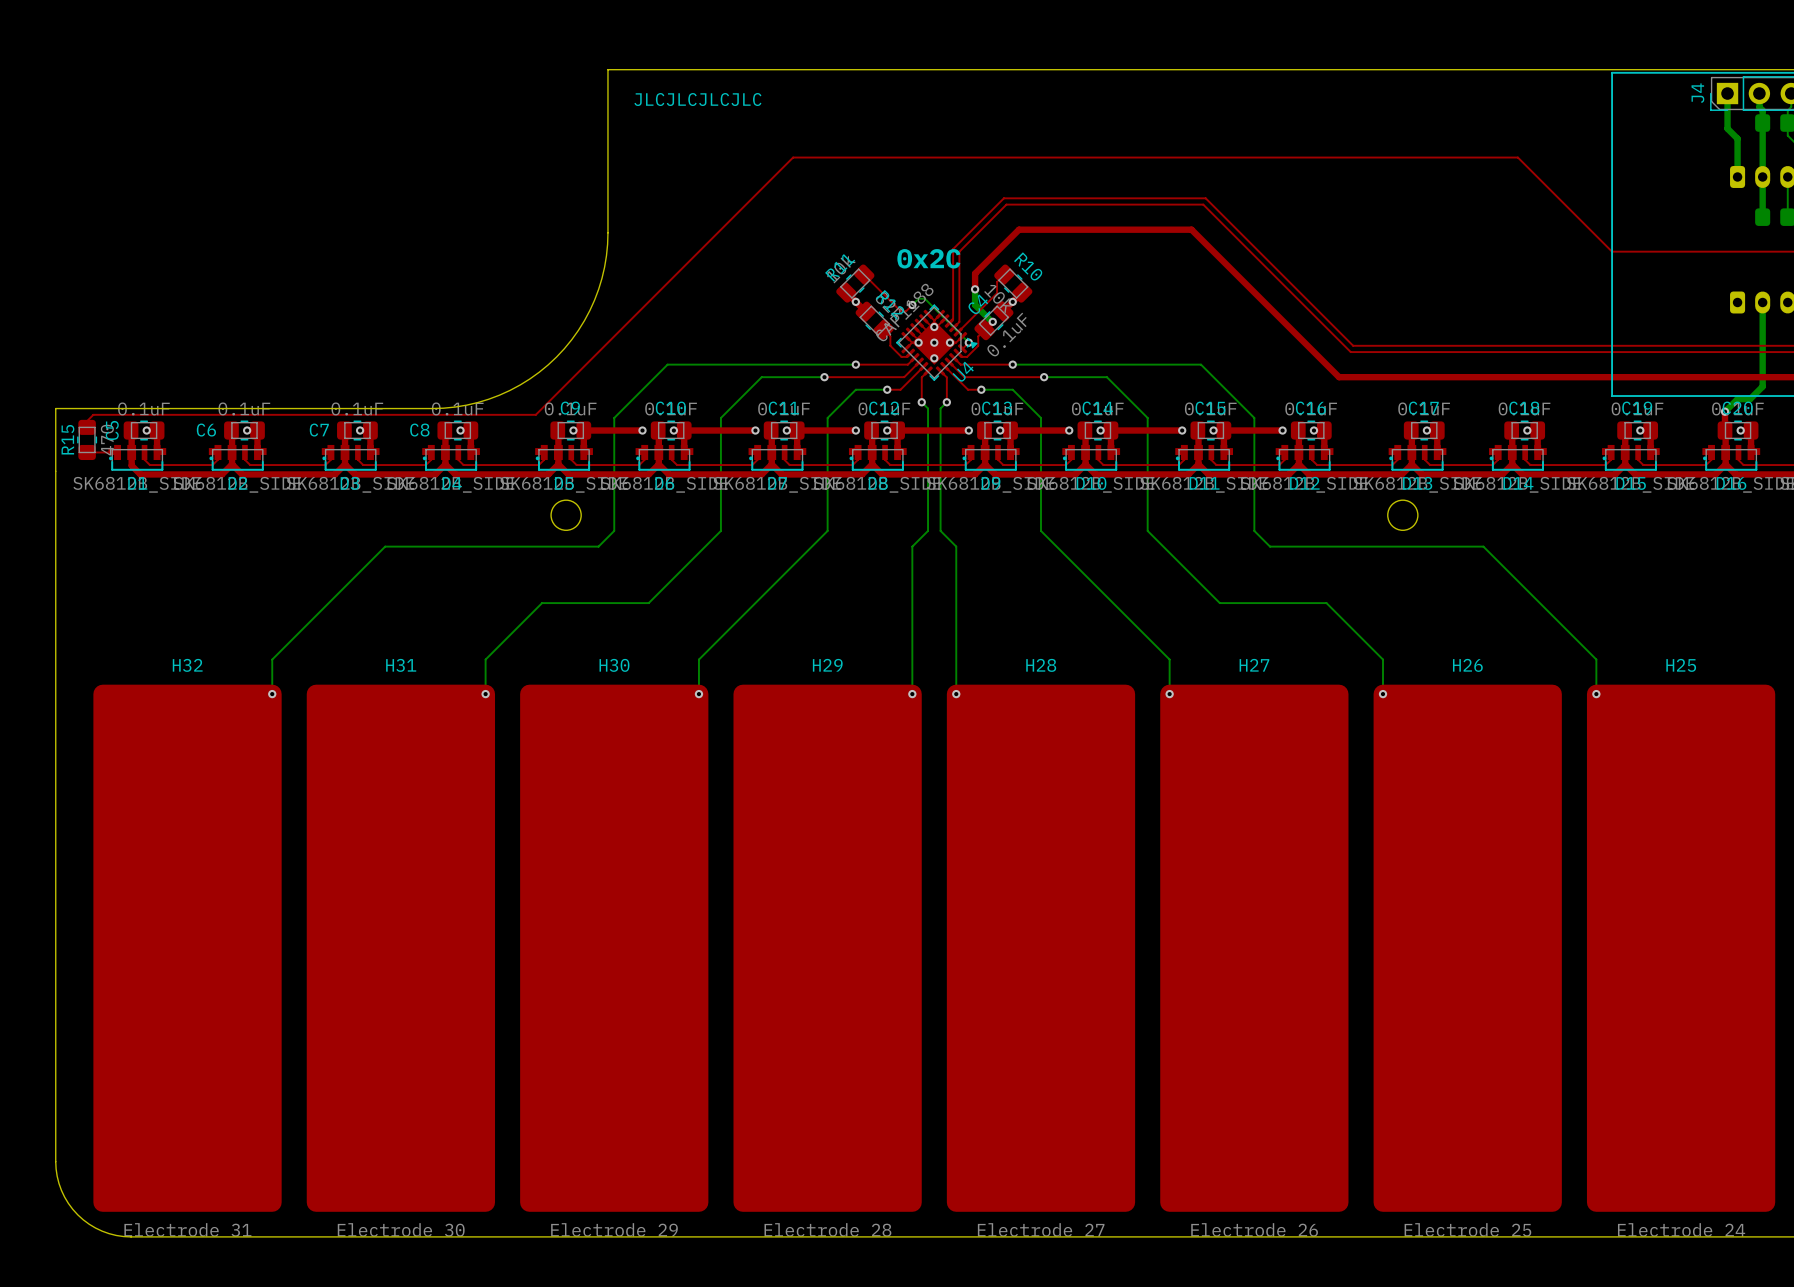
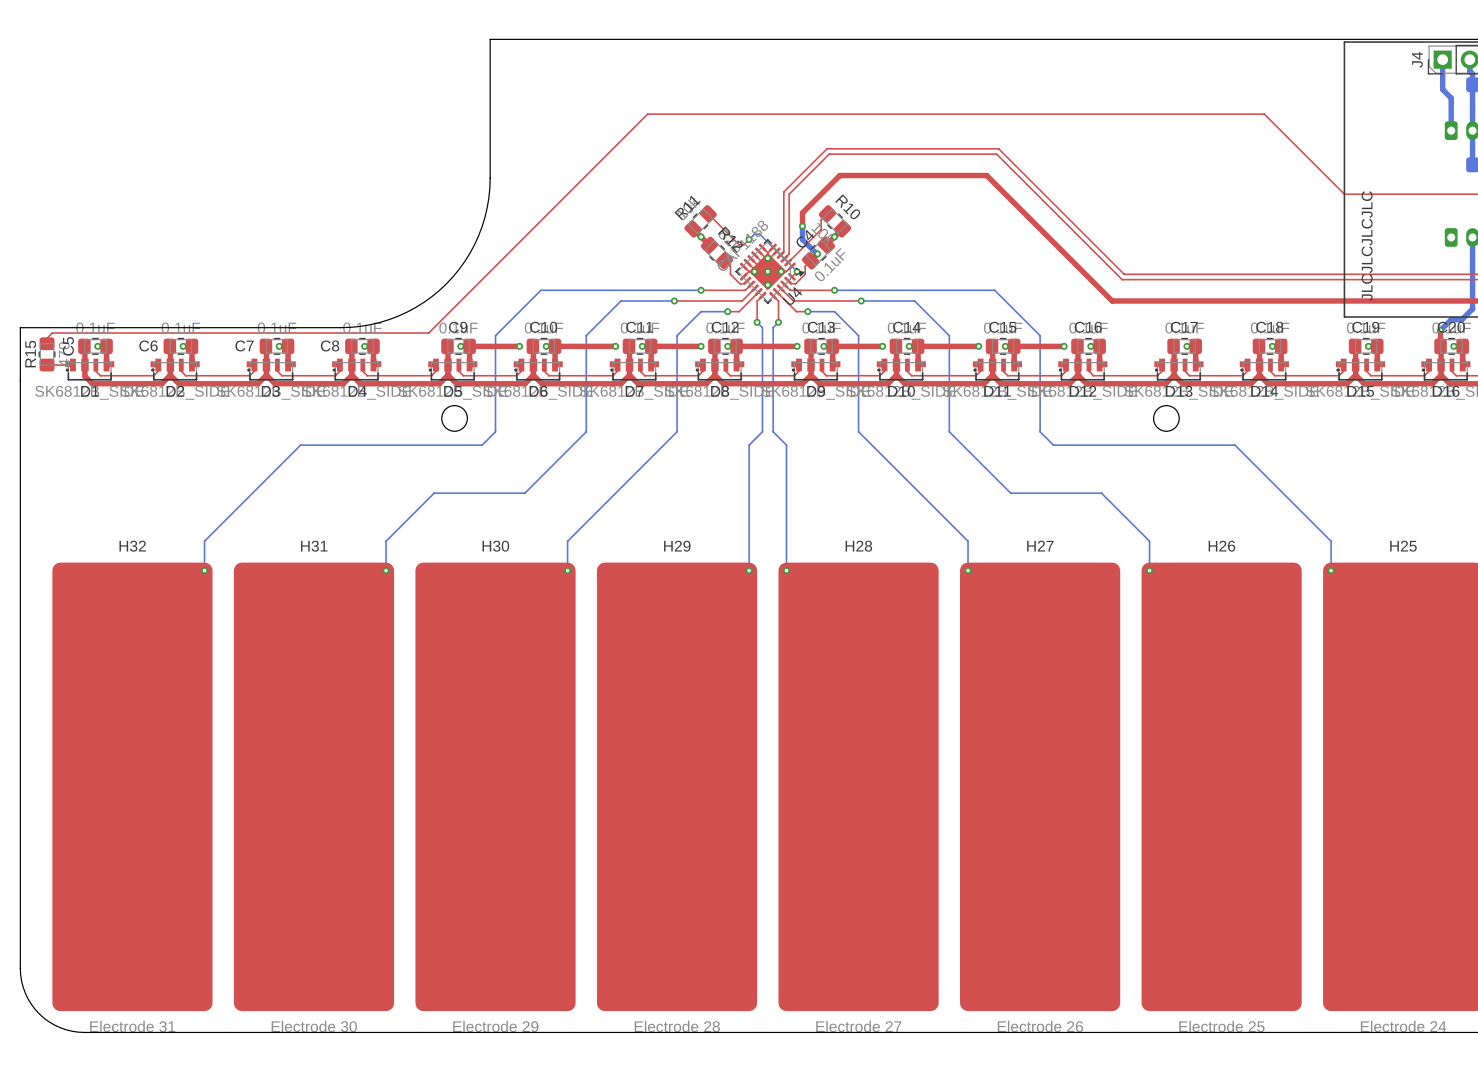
text: JLCJLCJLCJLC (697, 99) -> none
text: 0x2C (928, 258) -> none
text: none -> JLCJLCJLCJLC (1367, 245)

